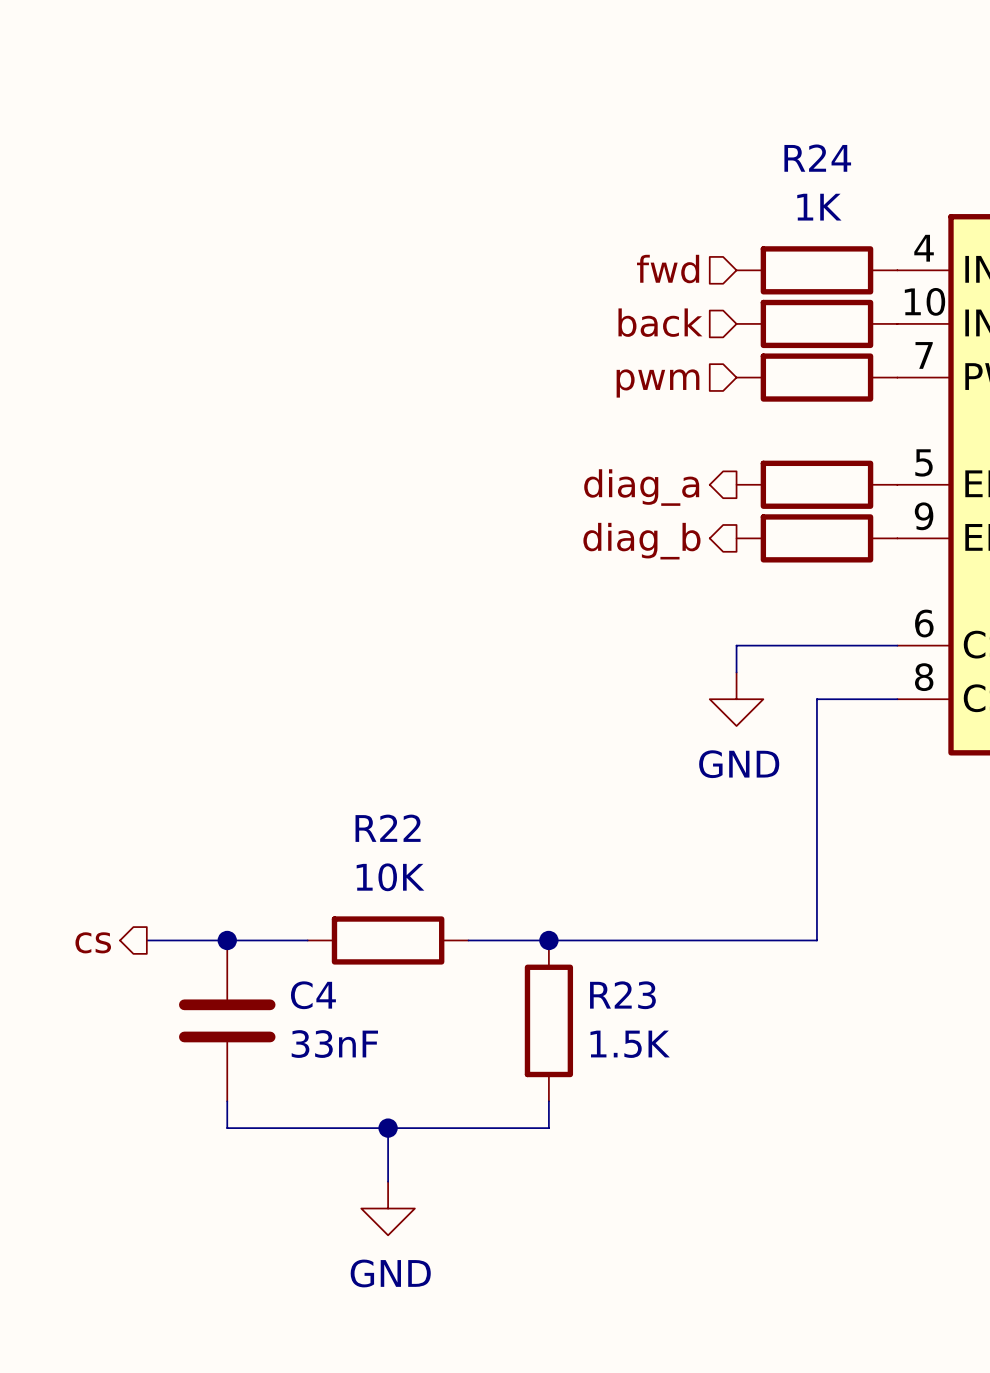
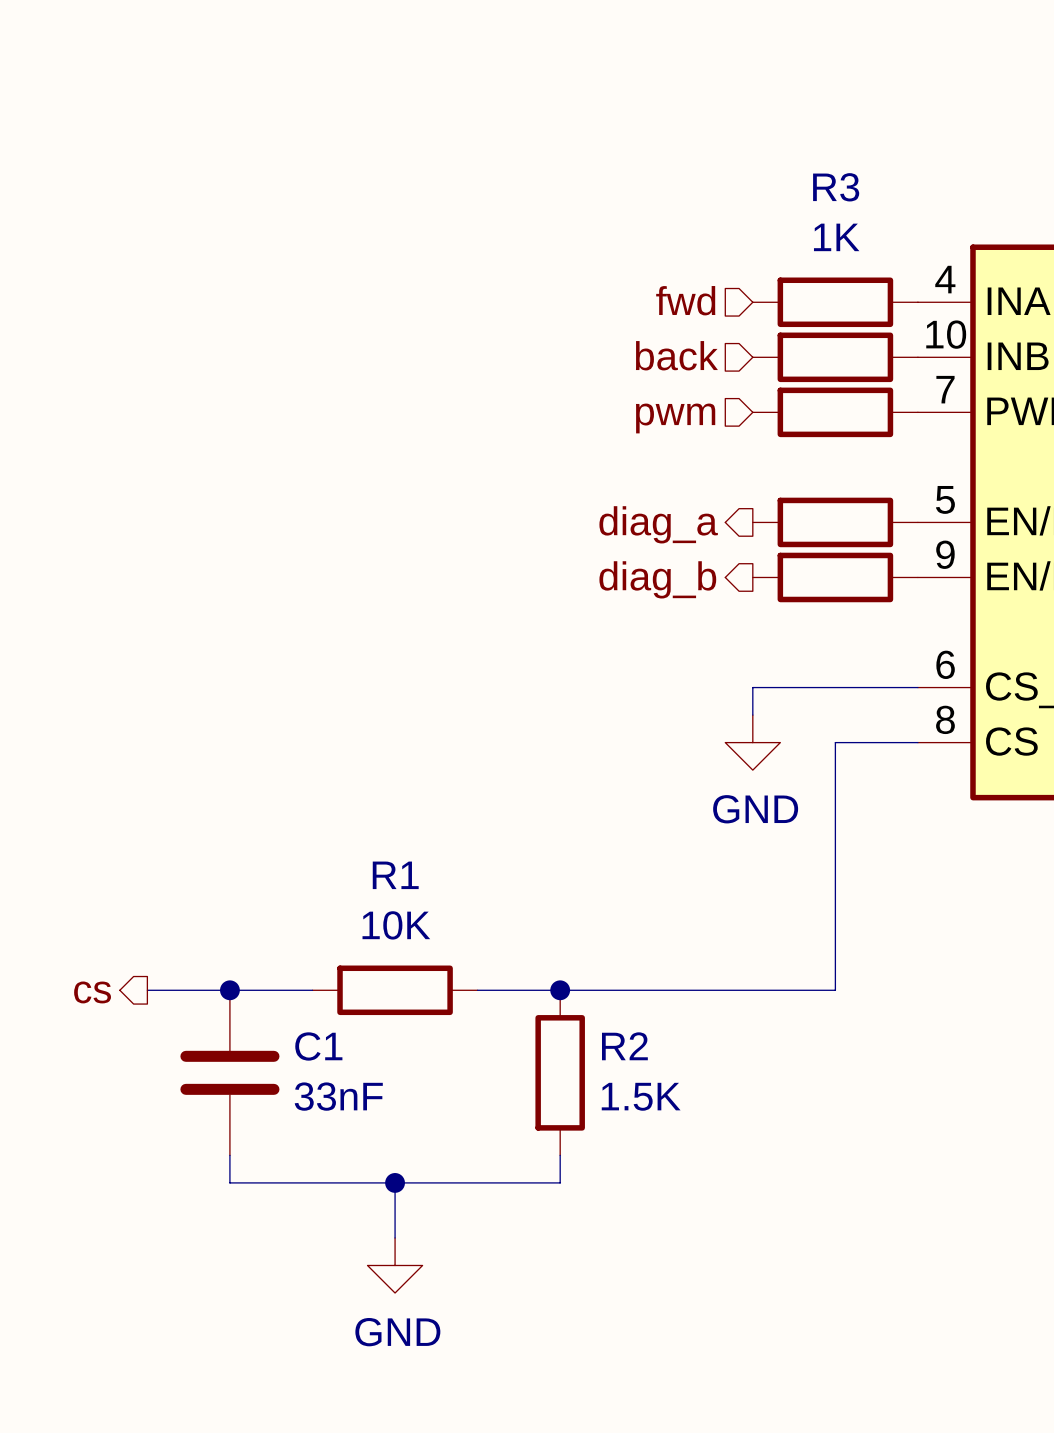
R24 name: R24 (817, 158) -> R3 (836, 187)
R22 name: R22 (388, 828) -> R1 (395, 875)
C4 name: C4 (313, 995) -> C1 (318, 1046)
R23 name: R23 (622, 995) -> R2 (624, 1046)

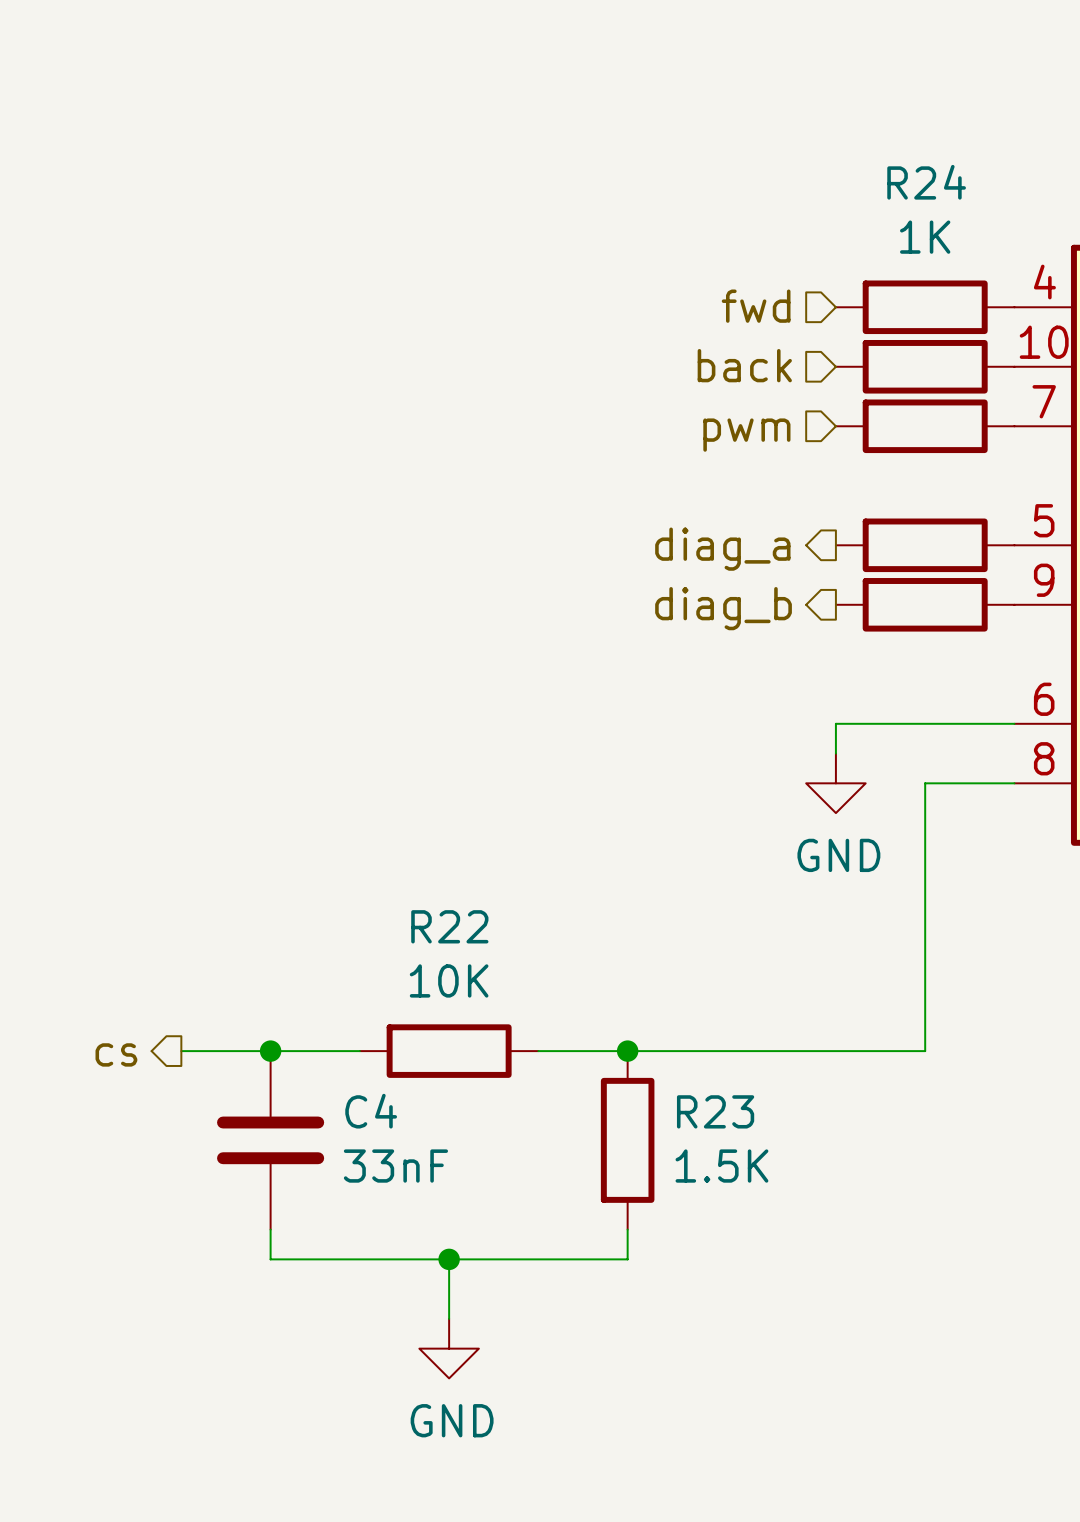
R3 name: R3 (836, 187) -> R24 (926, 182)
R1 name: R1 (395, 875) -> R22 (449, 926)
C1 name: C1 (318, 1046) -> C4 (371, 1111)
R2 name: R2 (624, 1046) -> R23 (715, 1111)

